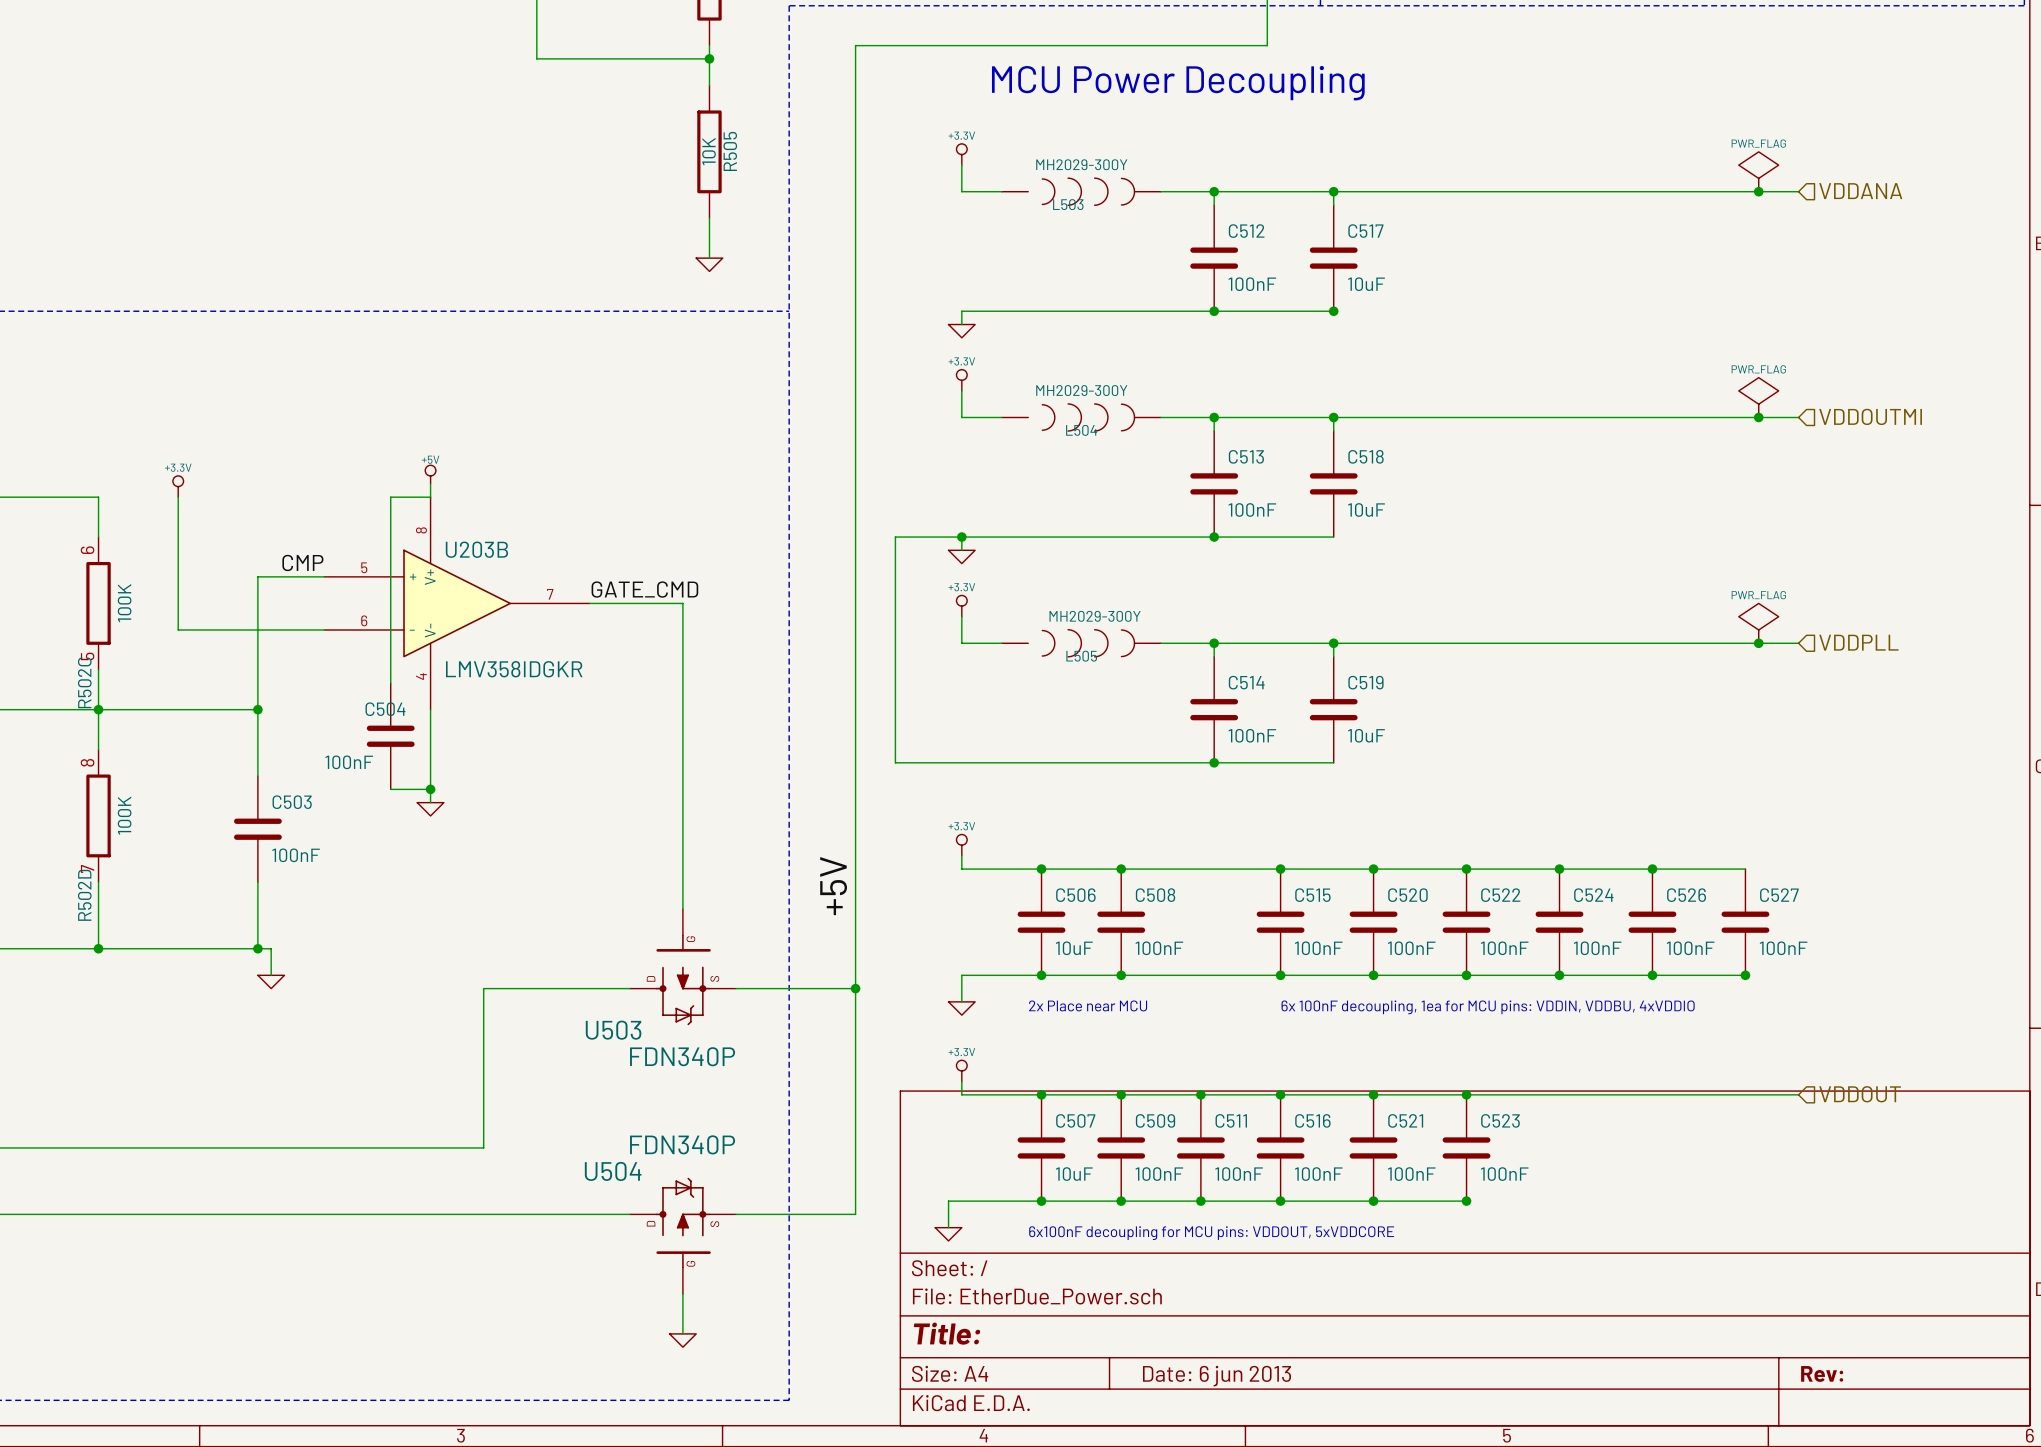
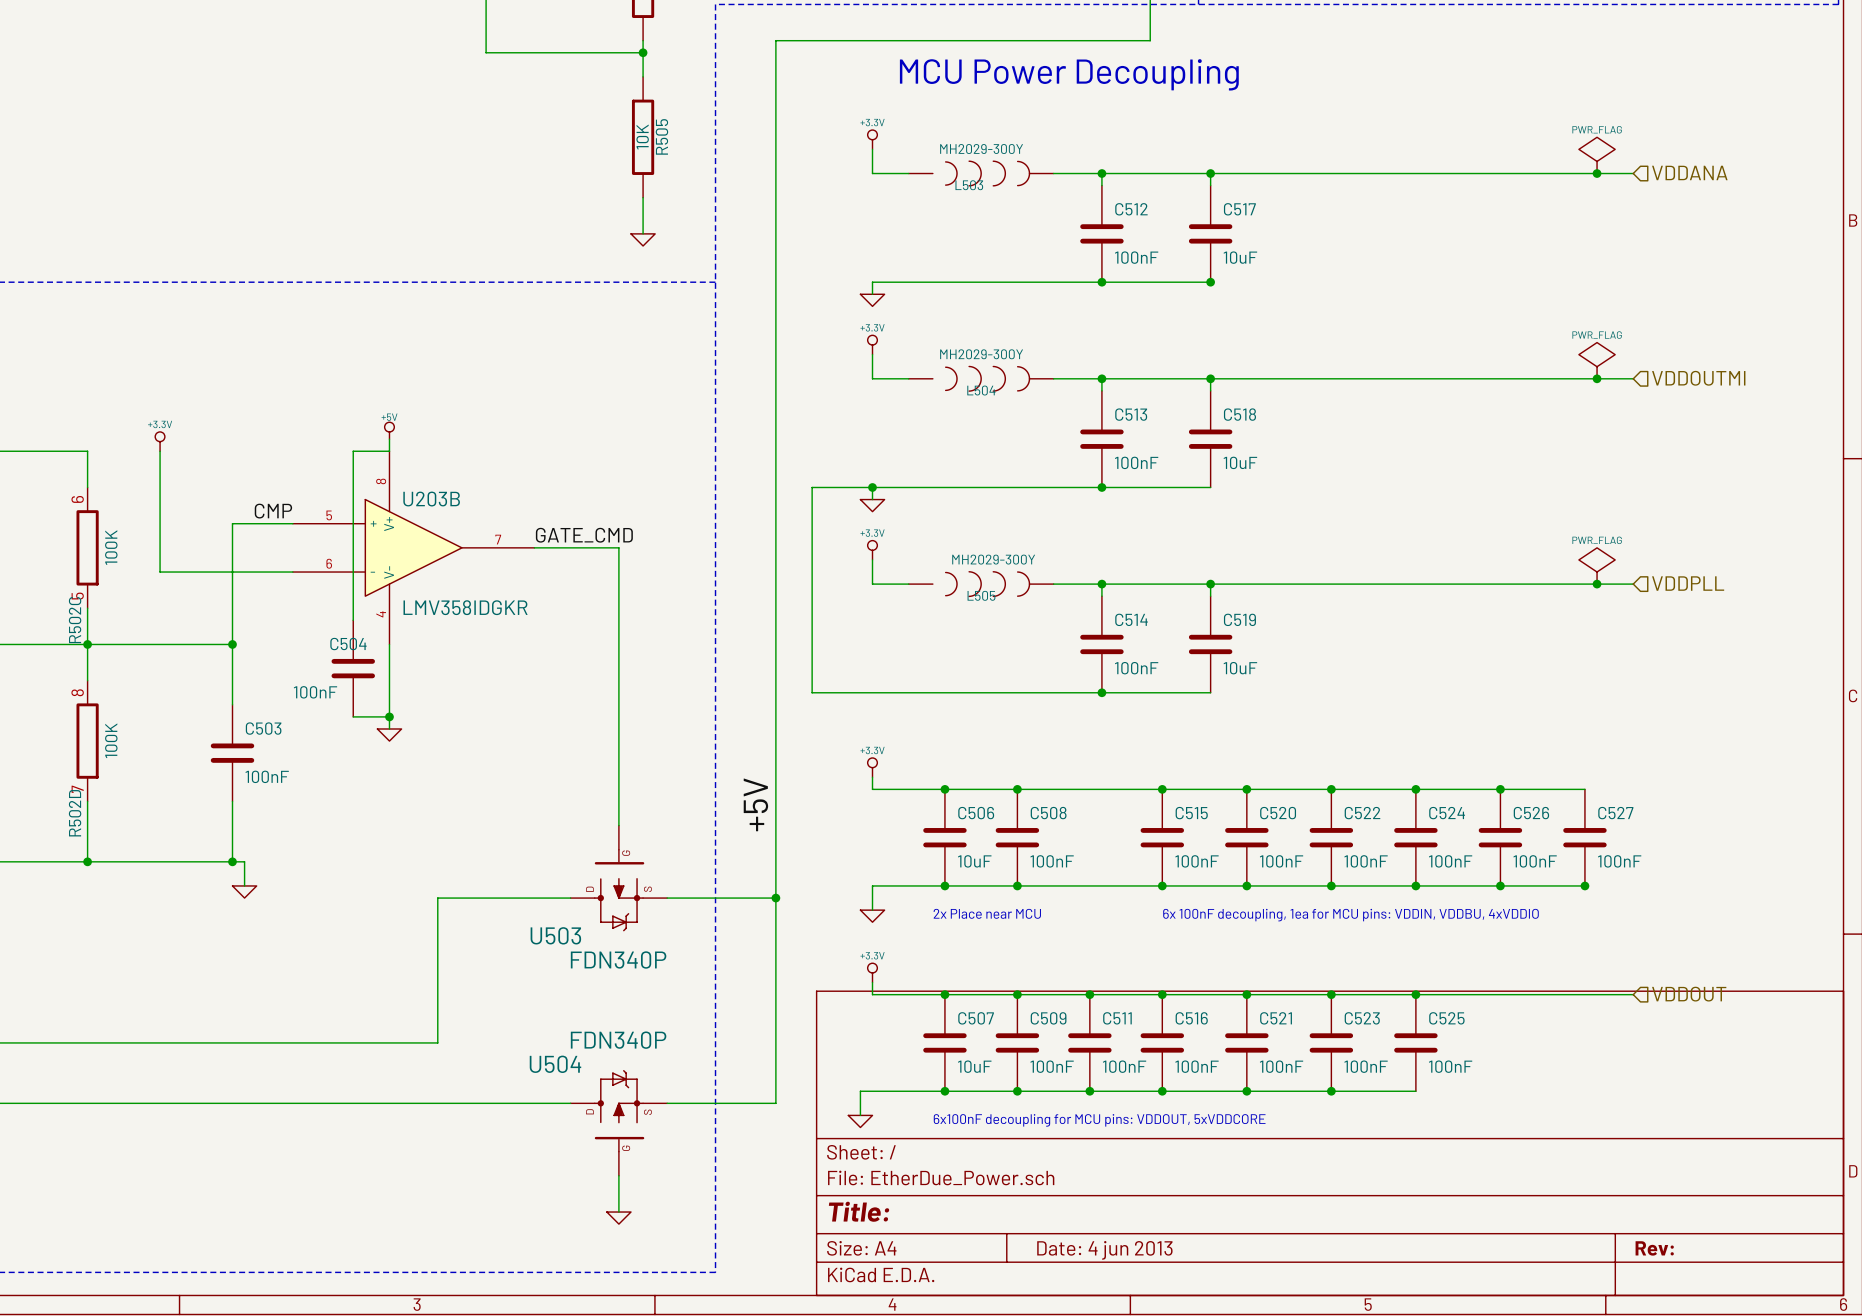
junction: none -> (1415, 994)
C525: none -> 100nF (1415, 1042)
wire: none -> (1331, 1091) (1415, 1091)
title block: Date: 6 jun 2013 (1217, 1376) -> Date: 4 jun 2013 (1104, 1250)

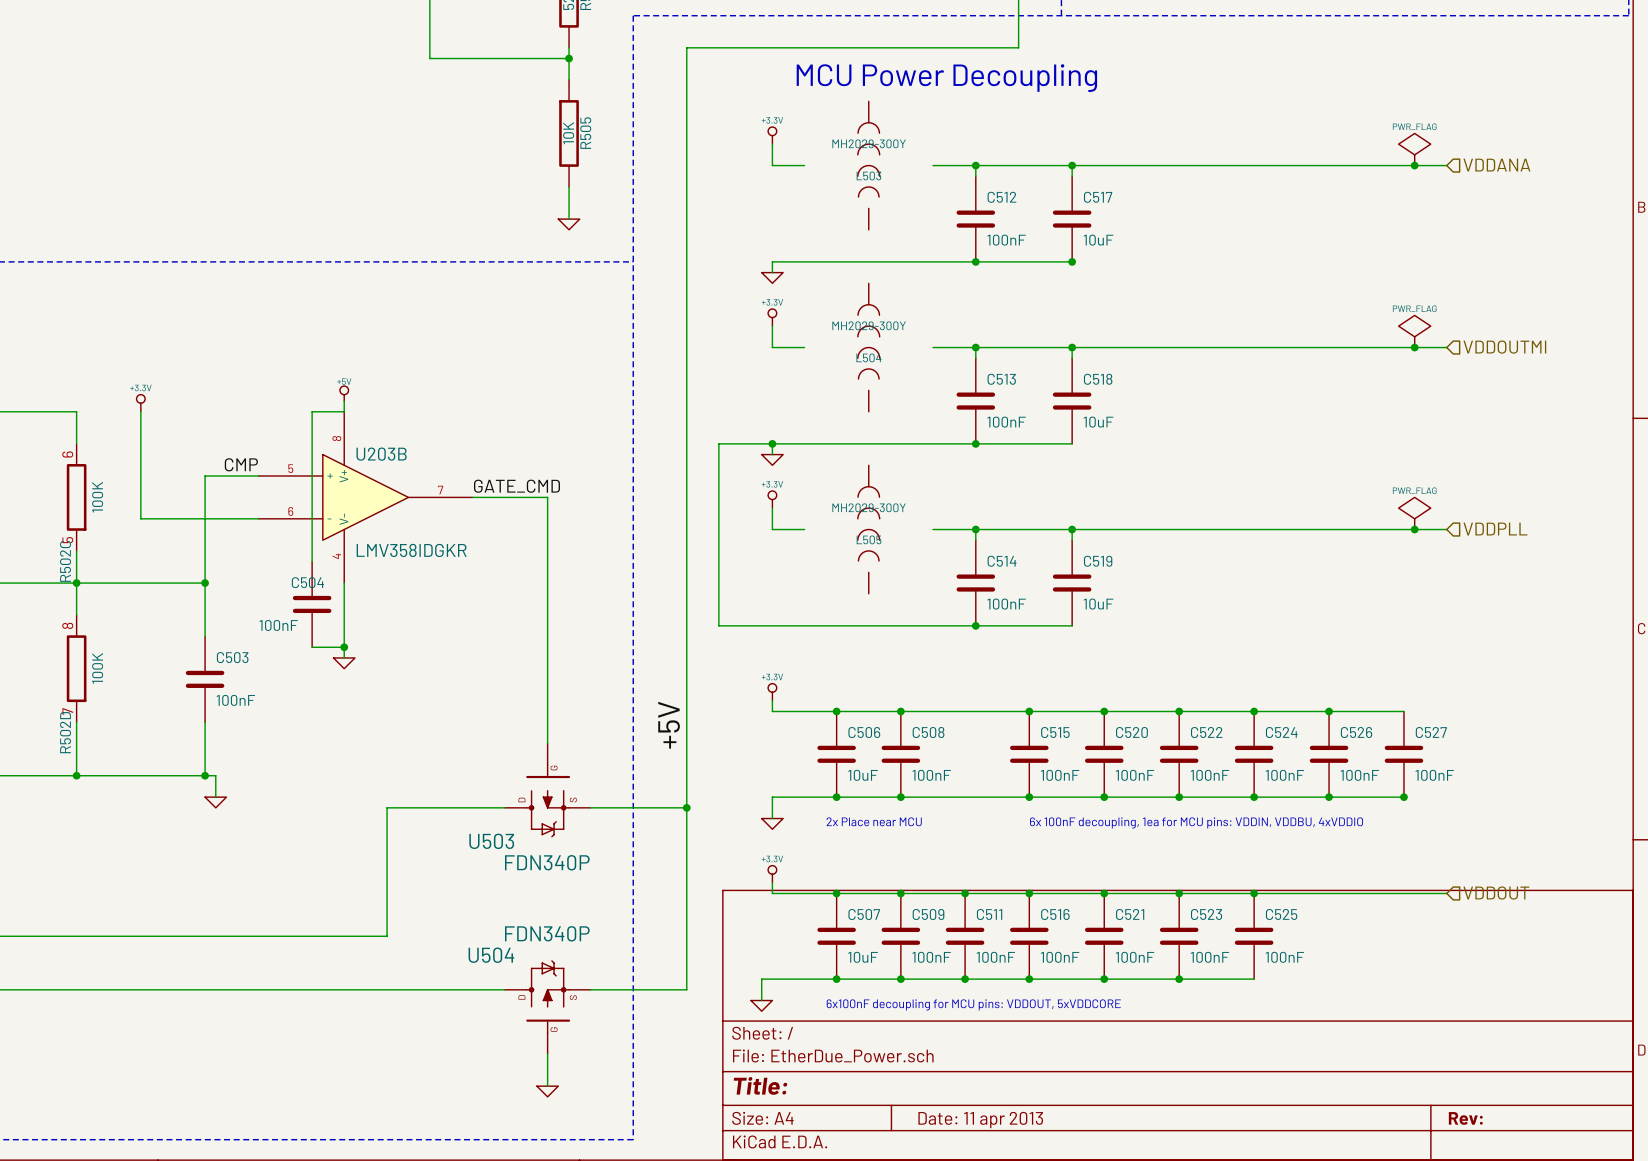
L503 rotation: 0° (987, 173) -> 90° counterclockwise (868, 159)
L504 rotation: 0° (987, 378) -> 90° counterclockwise (868, 341)
L505 rotation: 0° (987, 584) -> 90° counterclockwise (868, 523)
title block: Date: 4 jun 2013 (1104, 1250) -> Date: 11 apr 2013 (980, 1120)

